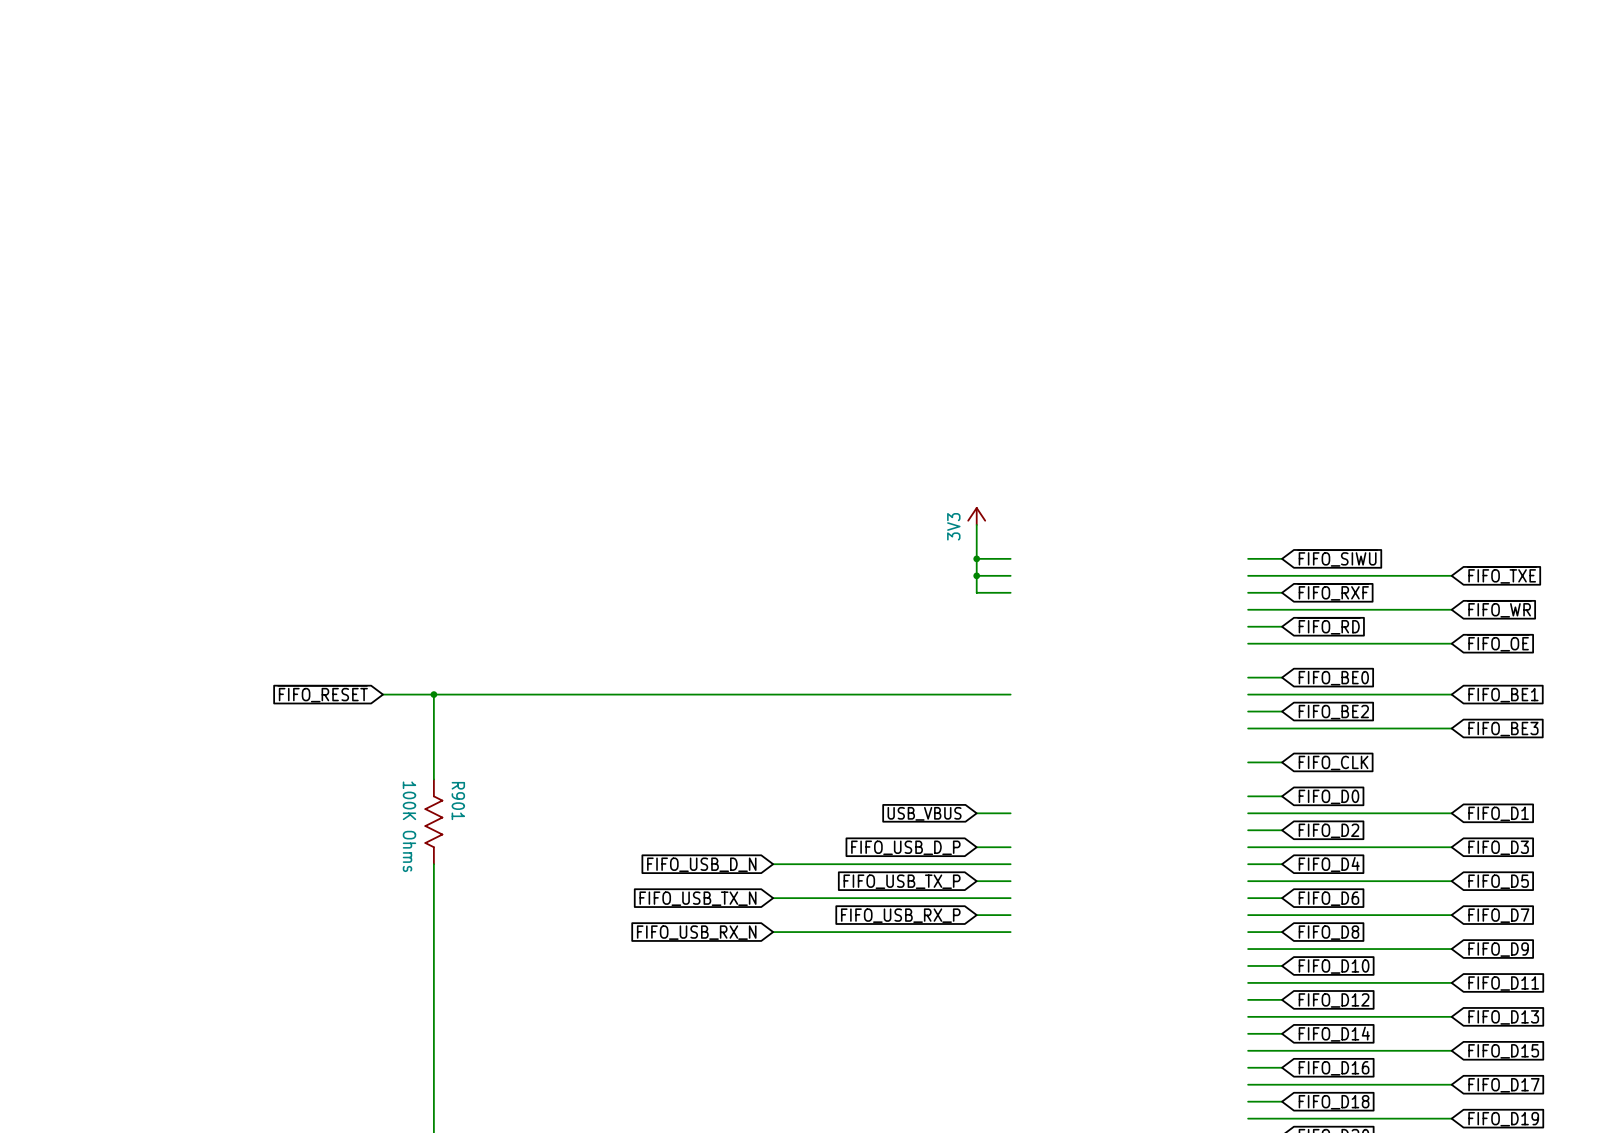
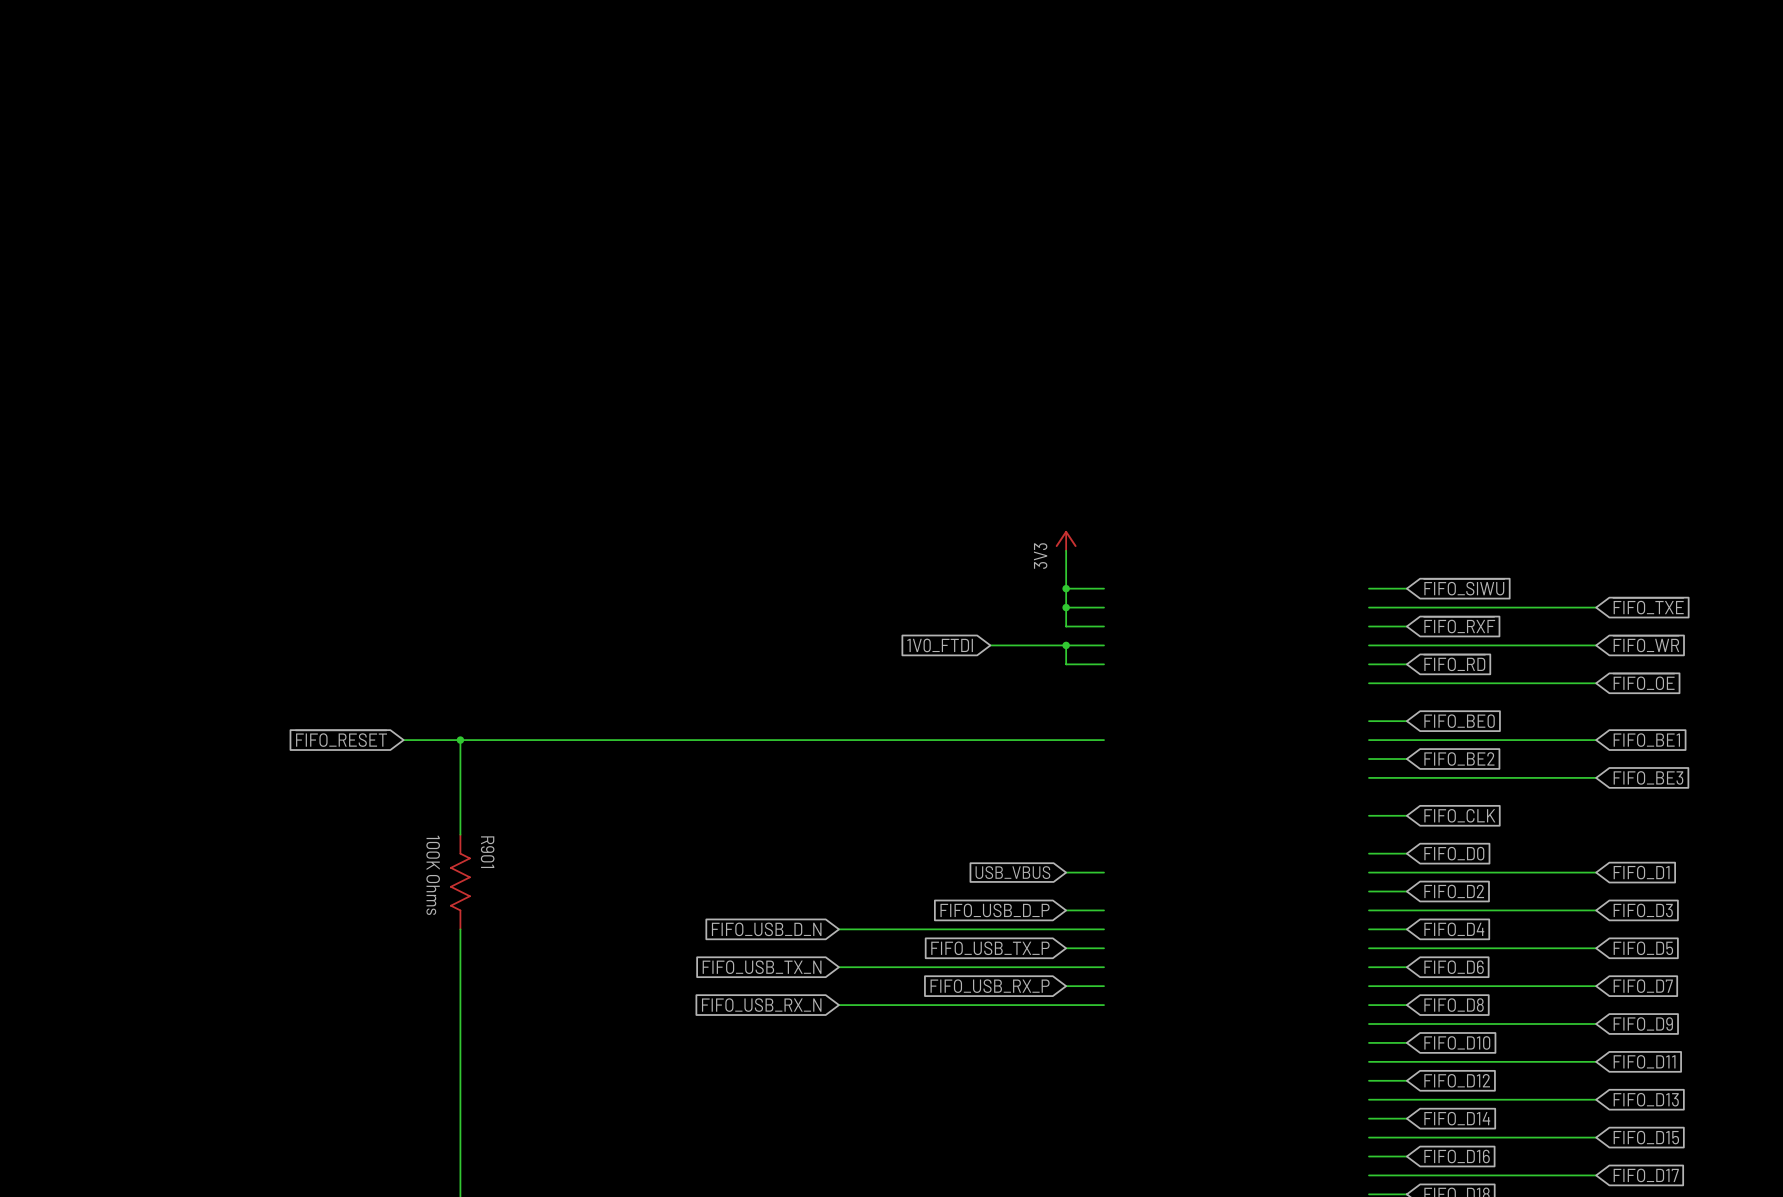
wire: none -> (990, 645) (1103, 645)
wire: none -> (1066, 645) (1066, 664) (1103, 664)
junction: none -> (1066, 645)
global label: none -> 1V0_FTDI (940, 645)

